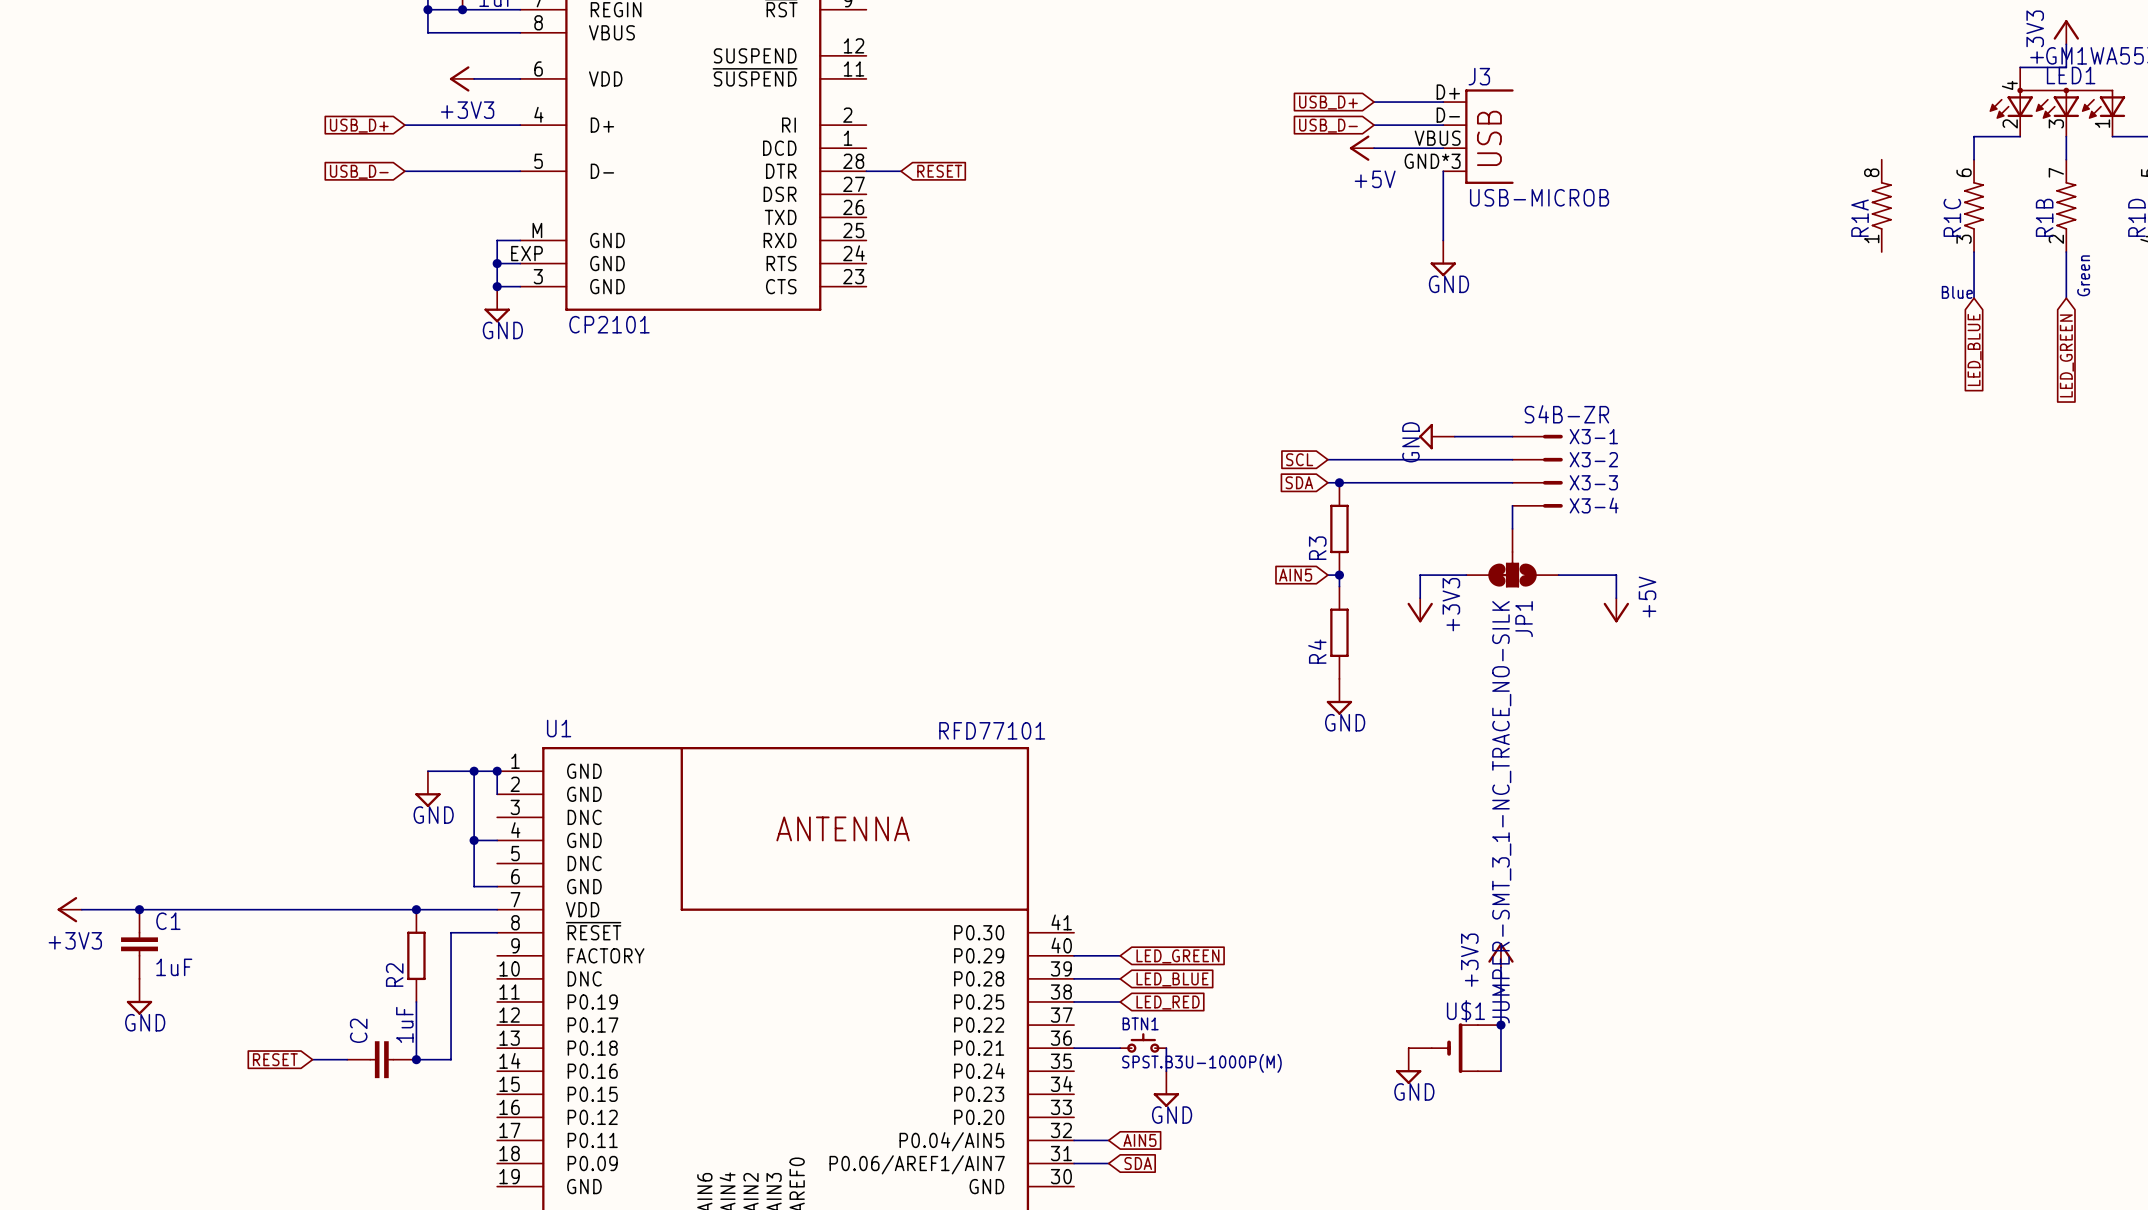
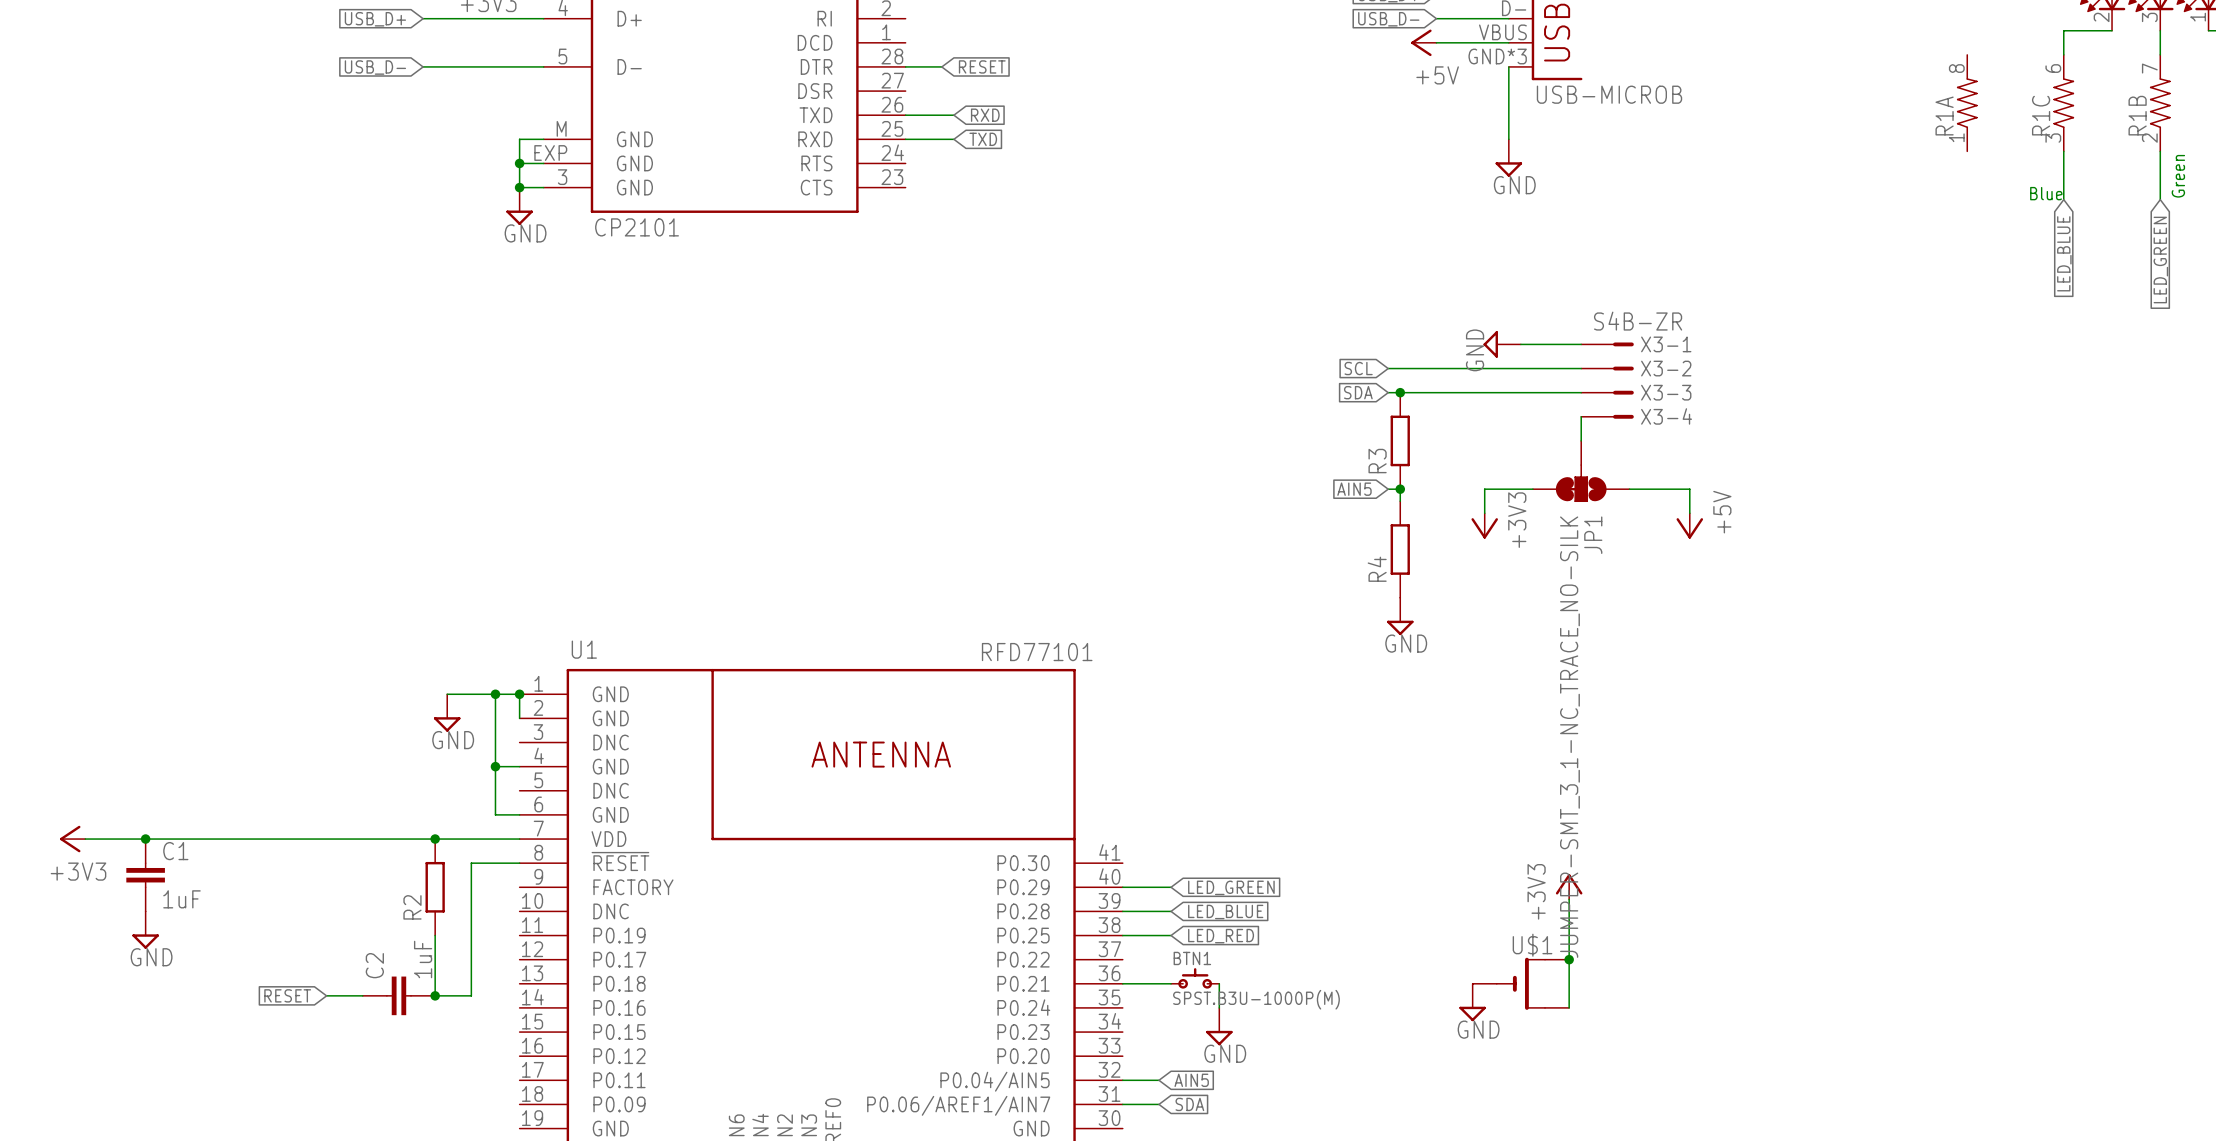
wire: none -> (905, 115) (953, 115)
global label: none -> RXD (985, 115)
wire: none -> (905, 139) (953, 139)
global label: none -> TXD (983, 139)

